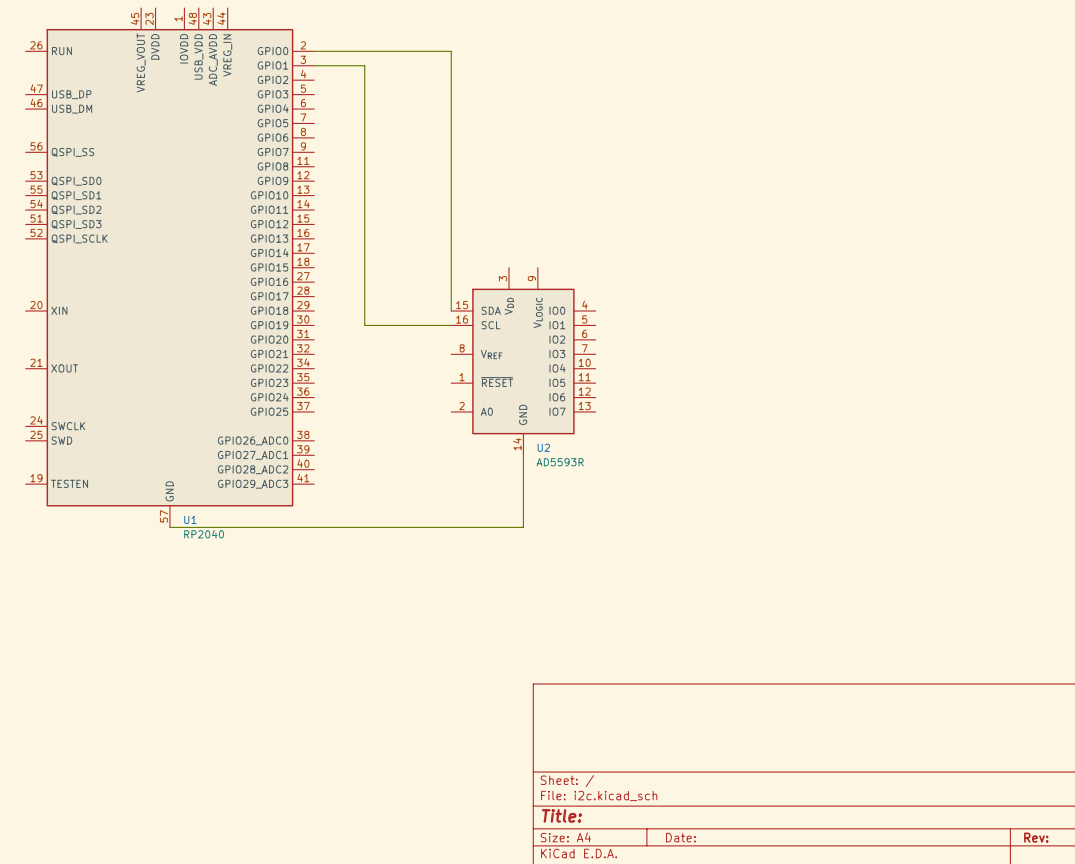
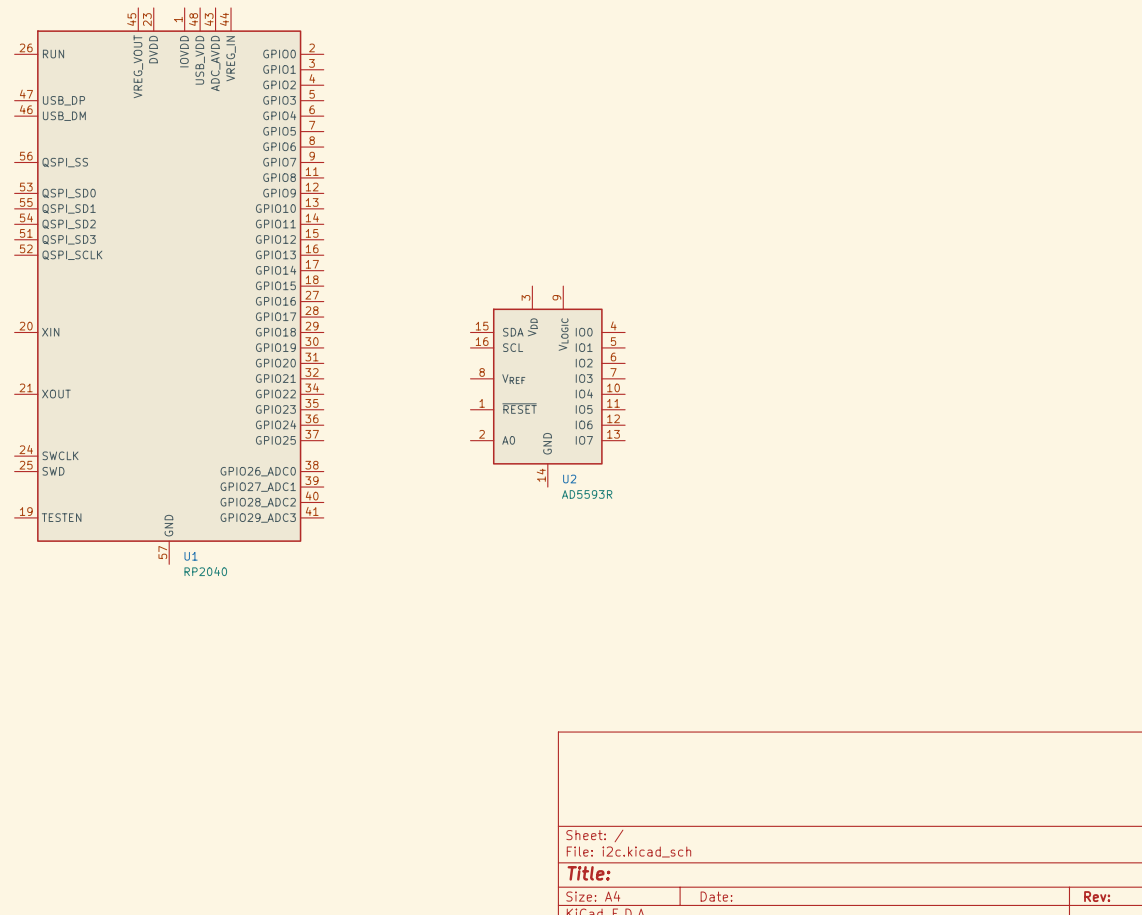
wire: (314, 51) (451, 51) (451, 311) -> none
wire: (314, 65) (364, 65) (364, 325) (451, 325) -> none
wire: (523, 455) (523, 527) (169, 527) -> none

